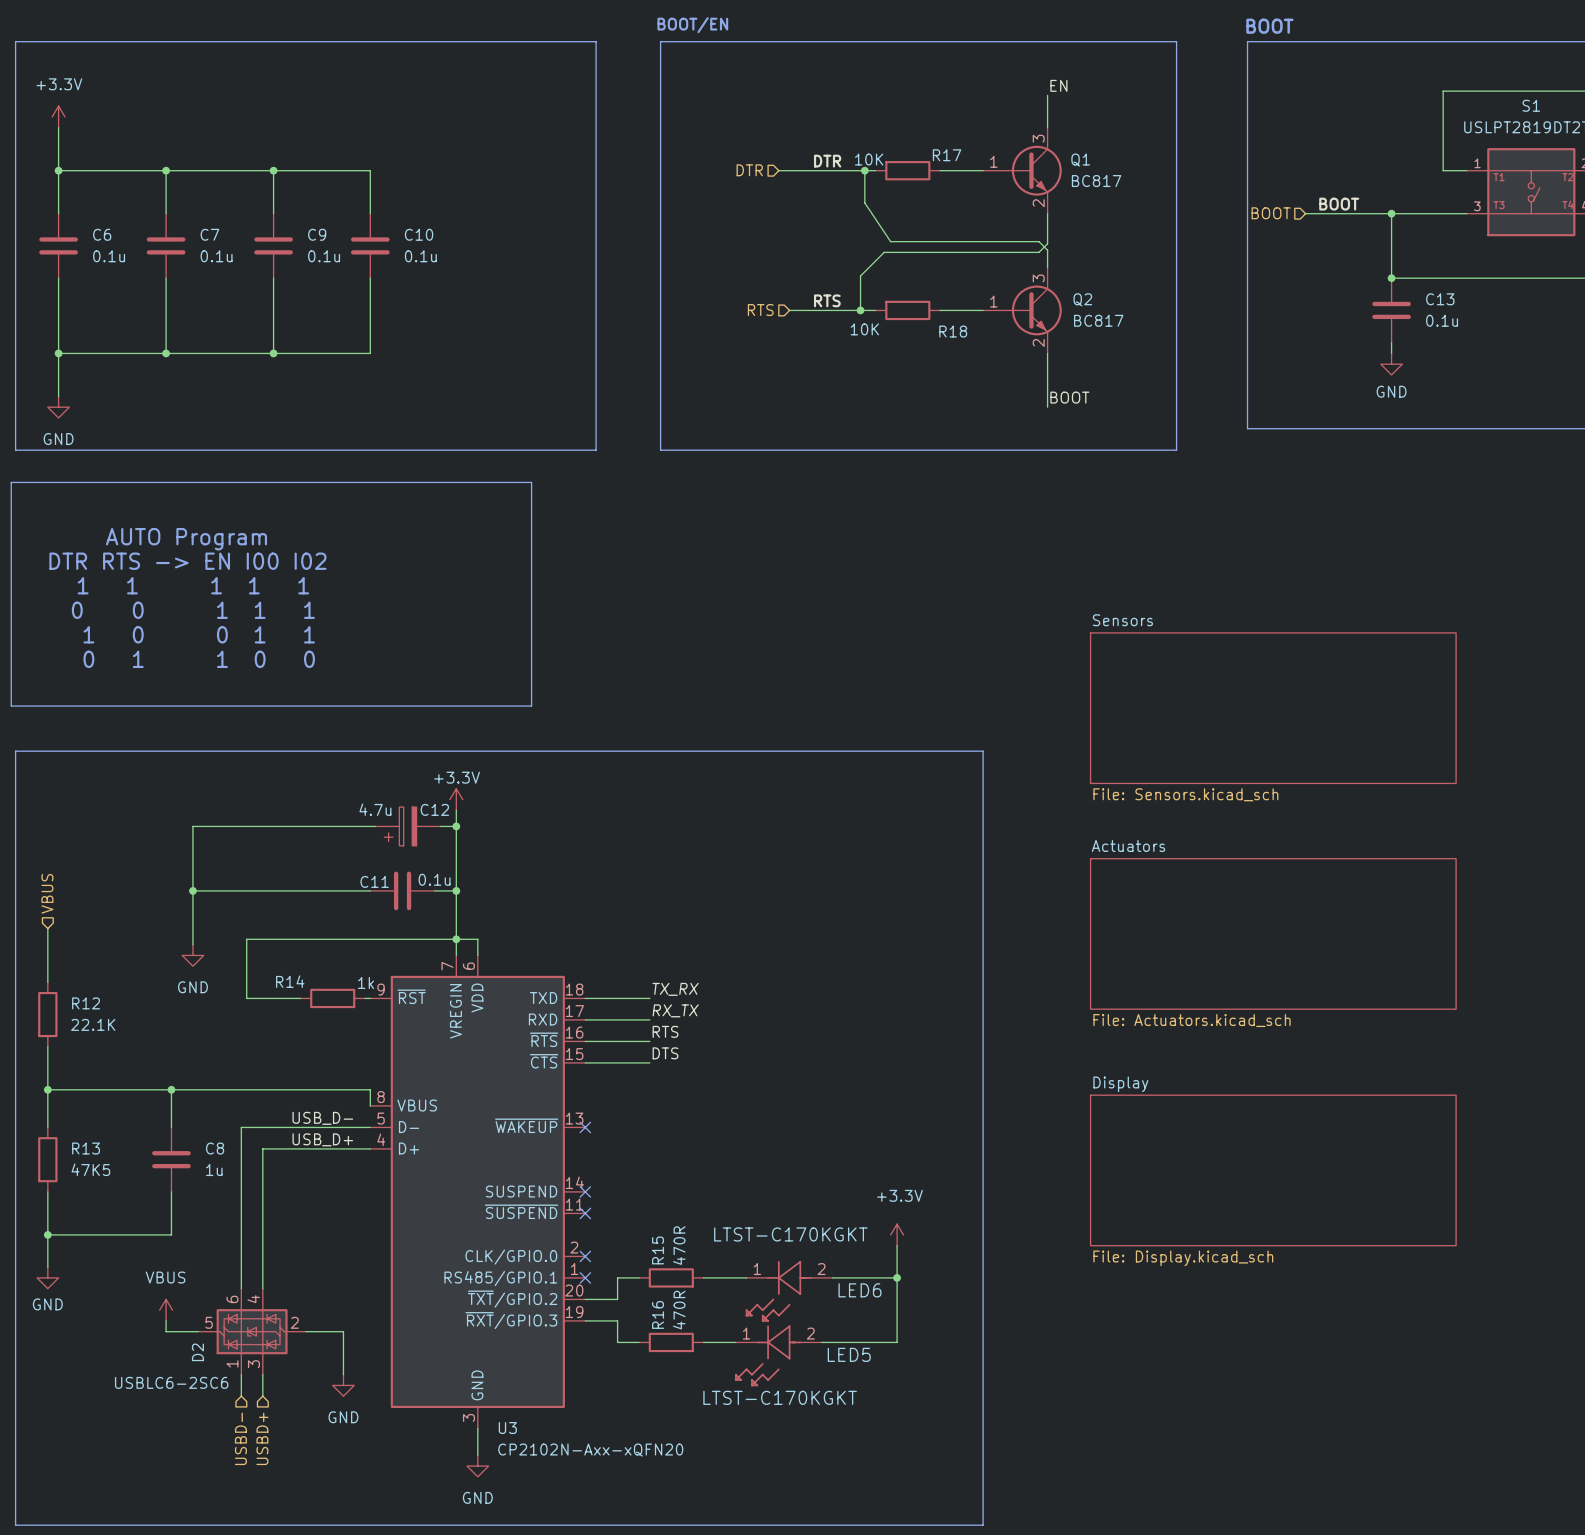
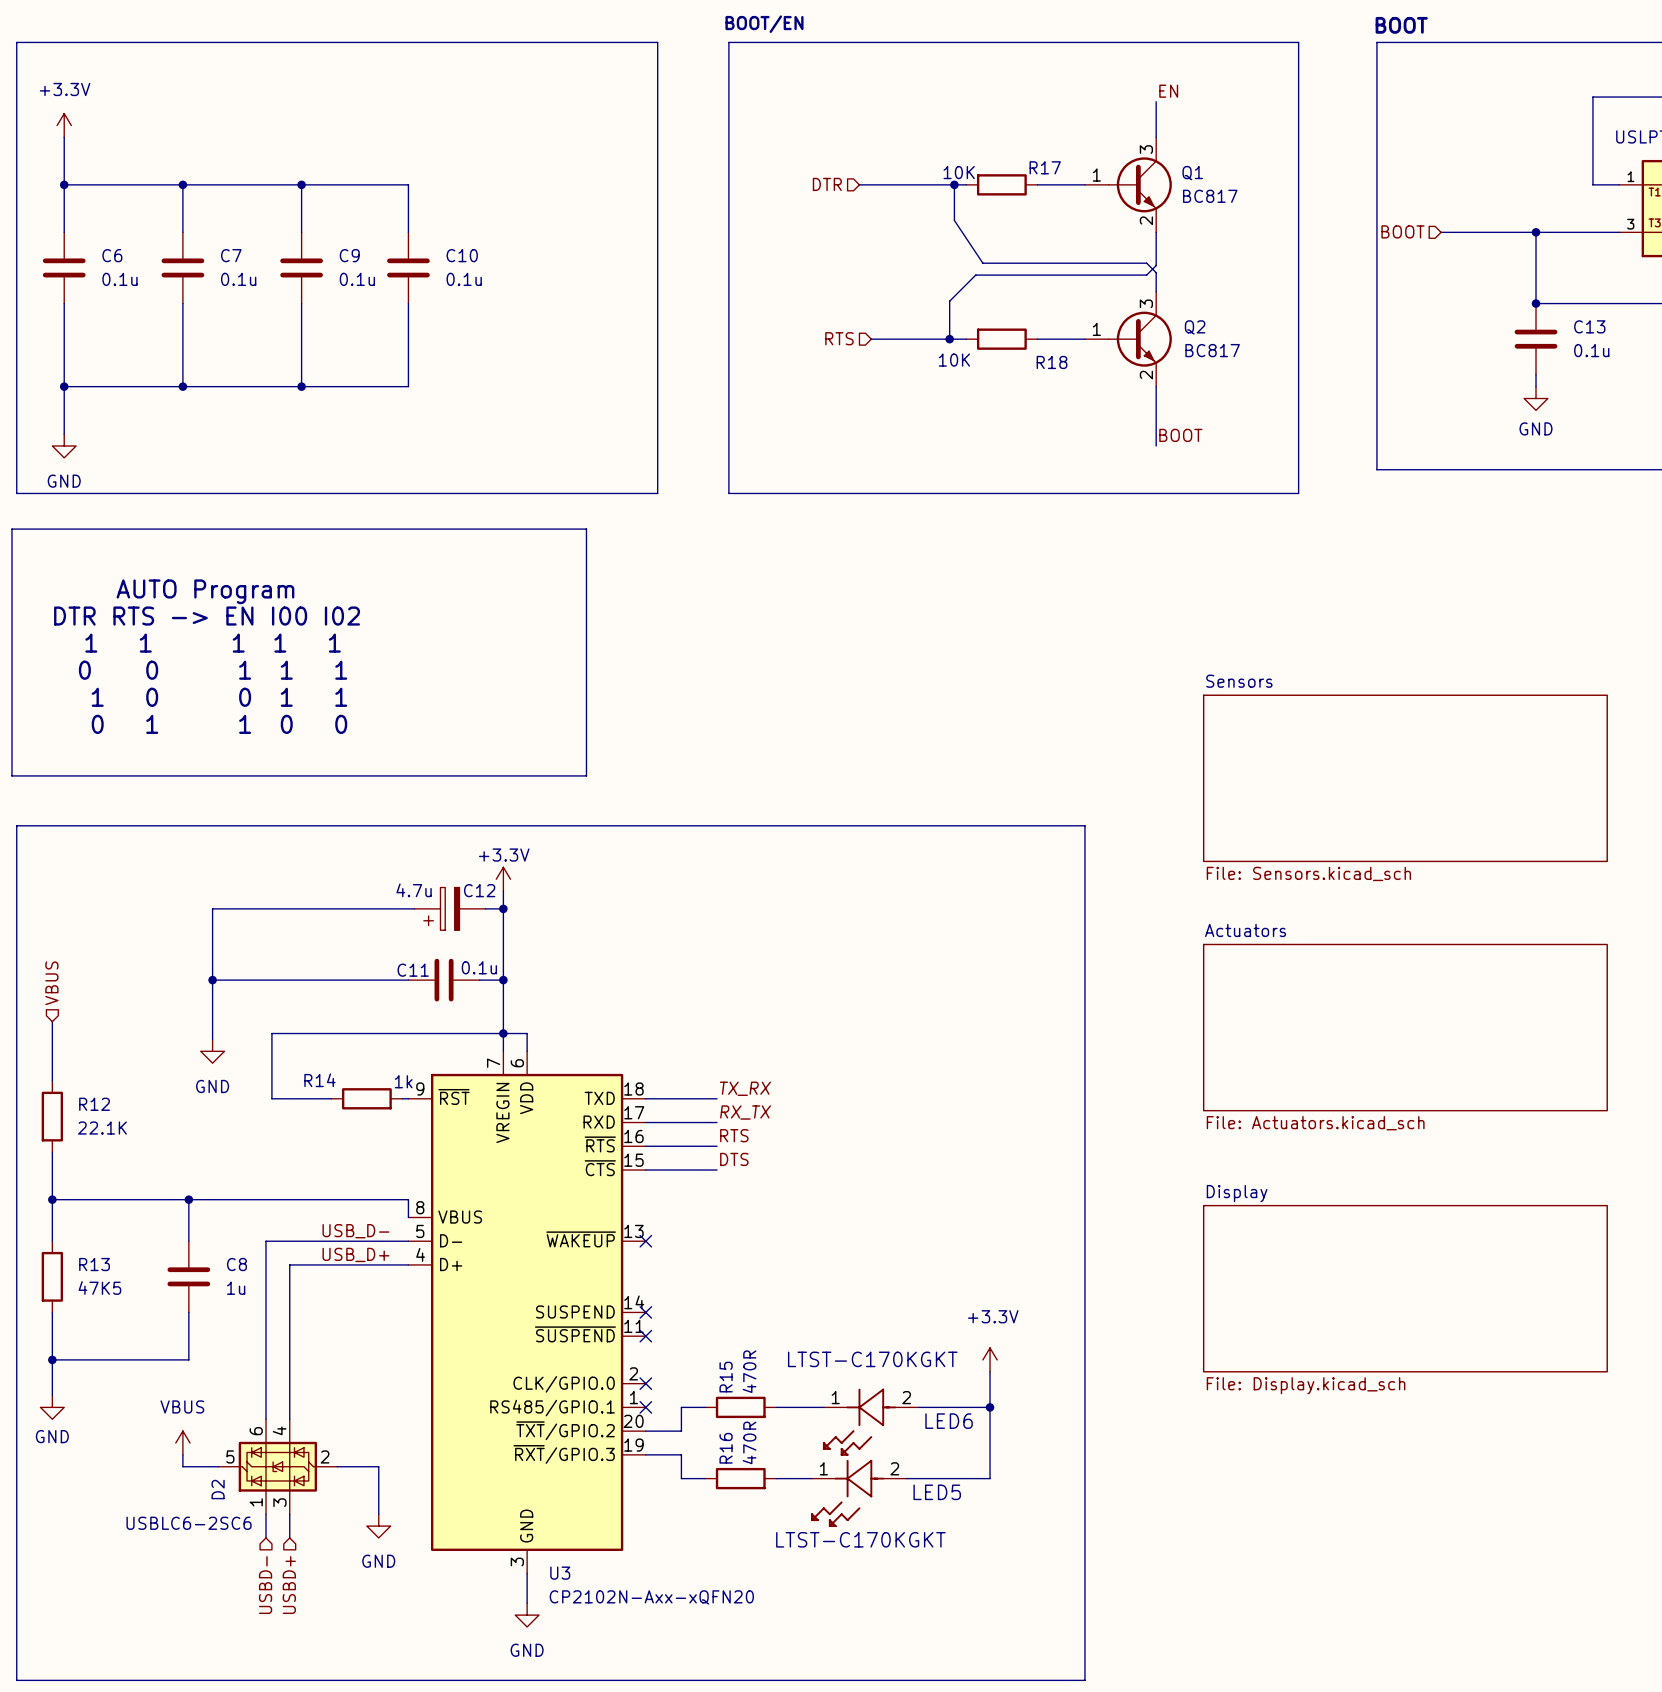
label: DTR (827, 161) -> none
label: BOOT (1339, 204) -> none
label: RTS (827, 300) -> none

